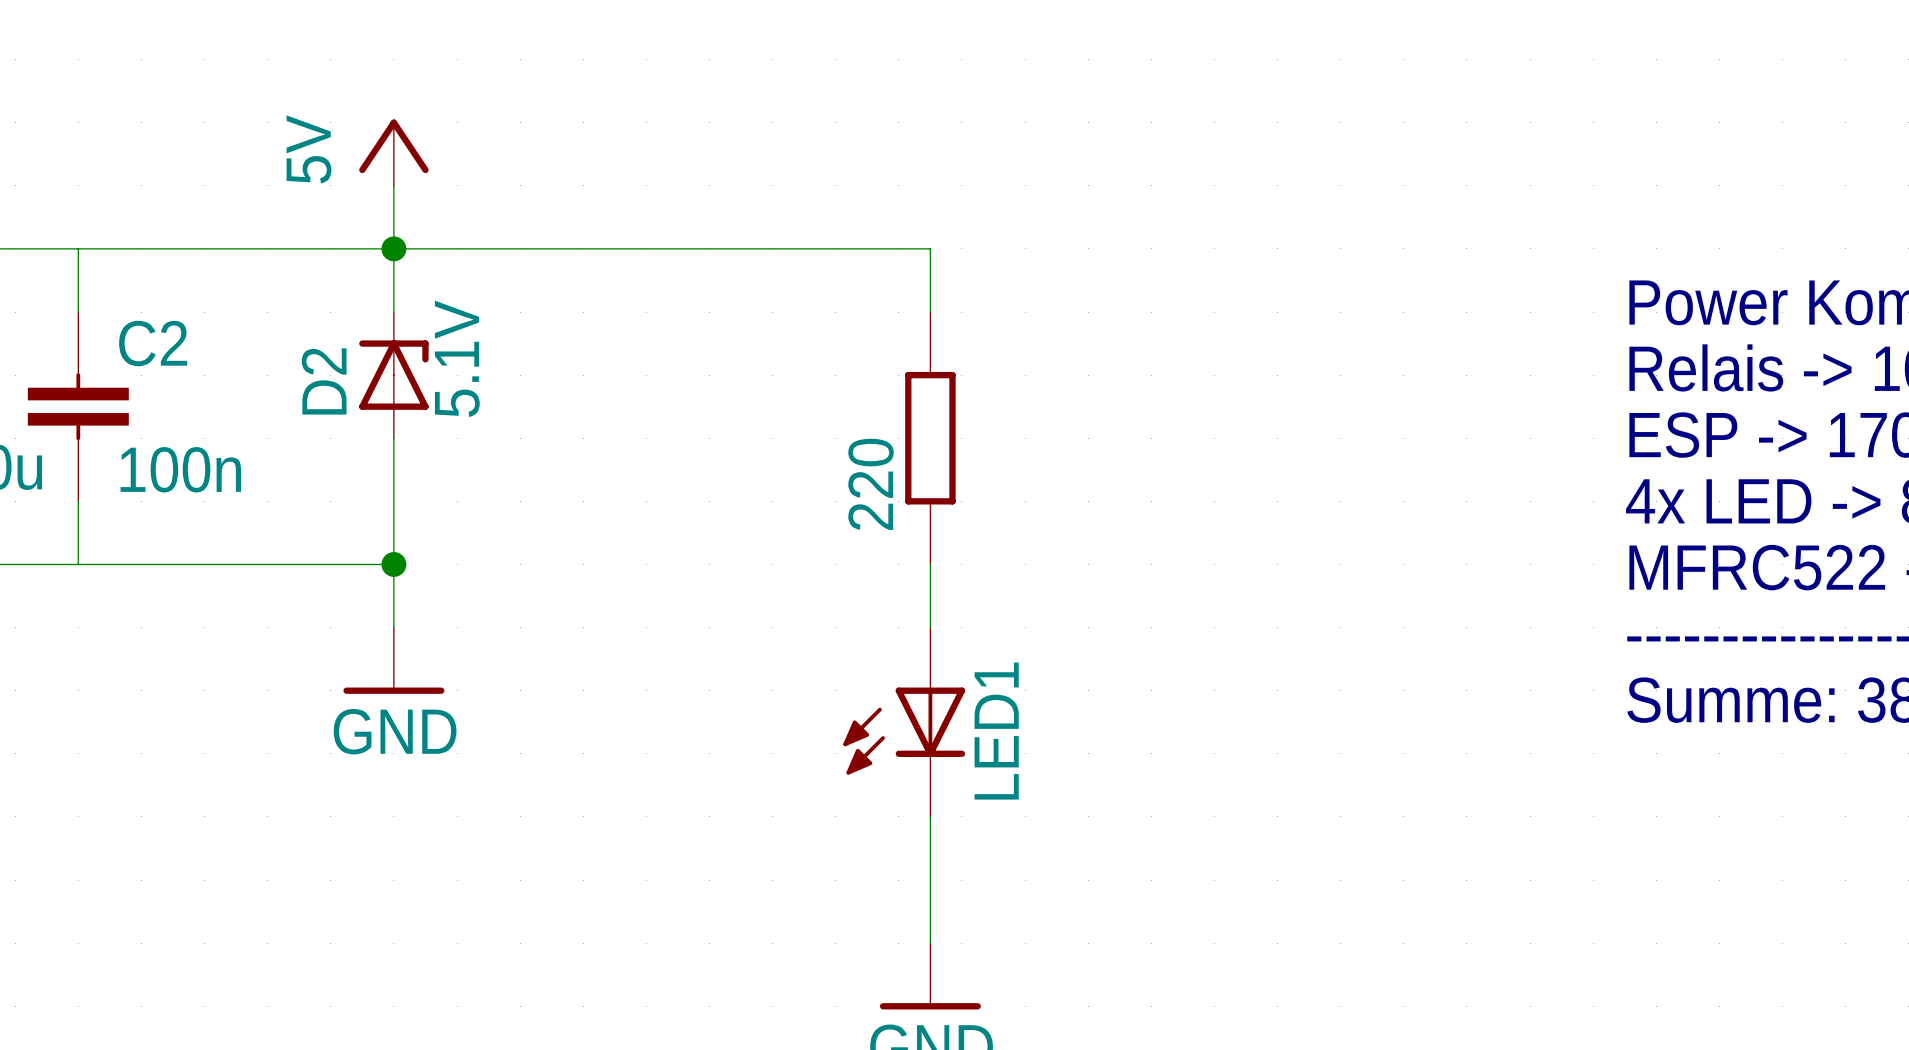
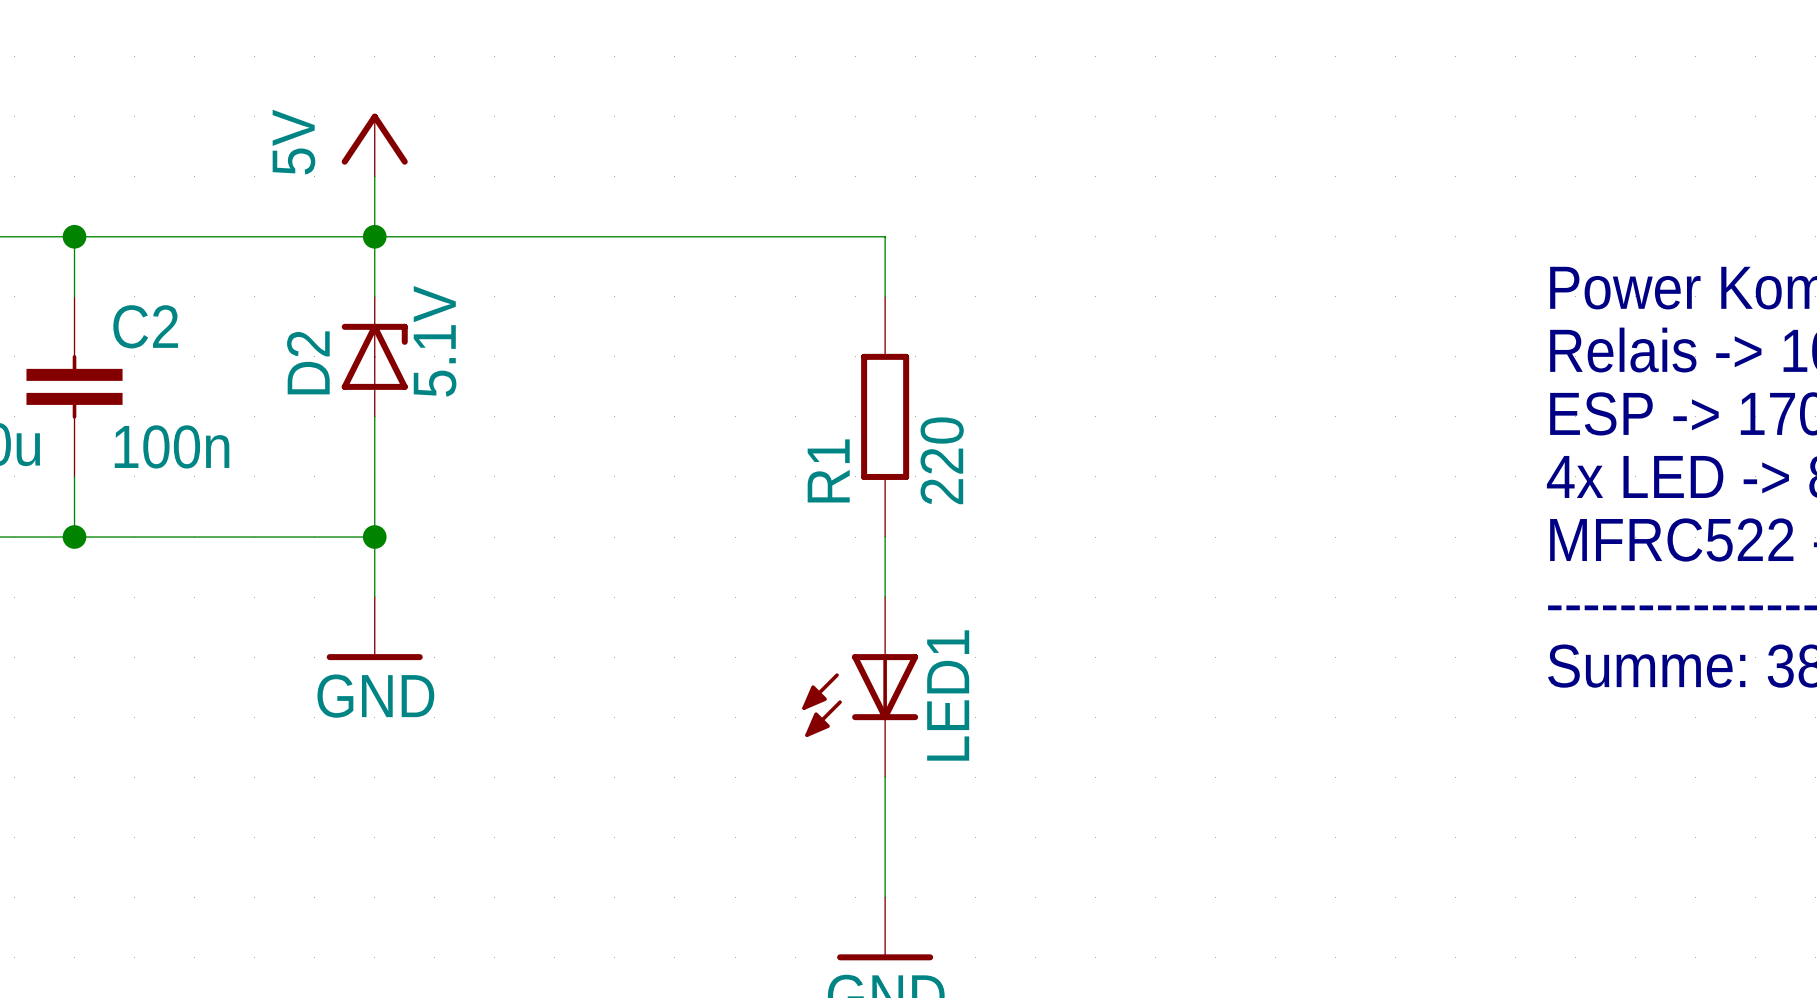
junction: none -> (74, 236)
220 name: 220 (871, 484) -> R1 (828, 470)
220 value: none -> 220 (942, 460)
junction: none -> (74, 537)

